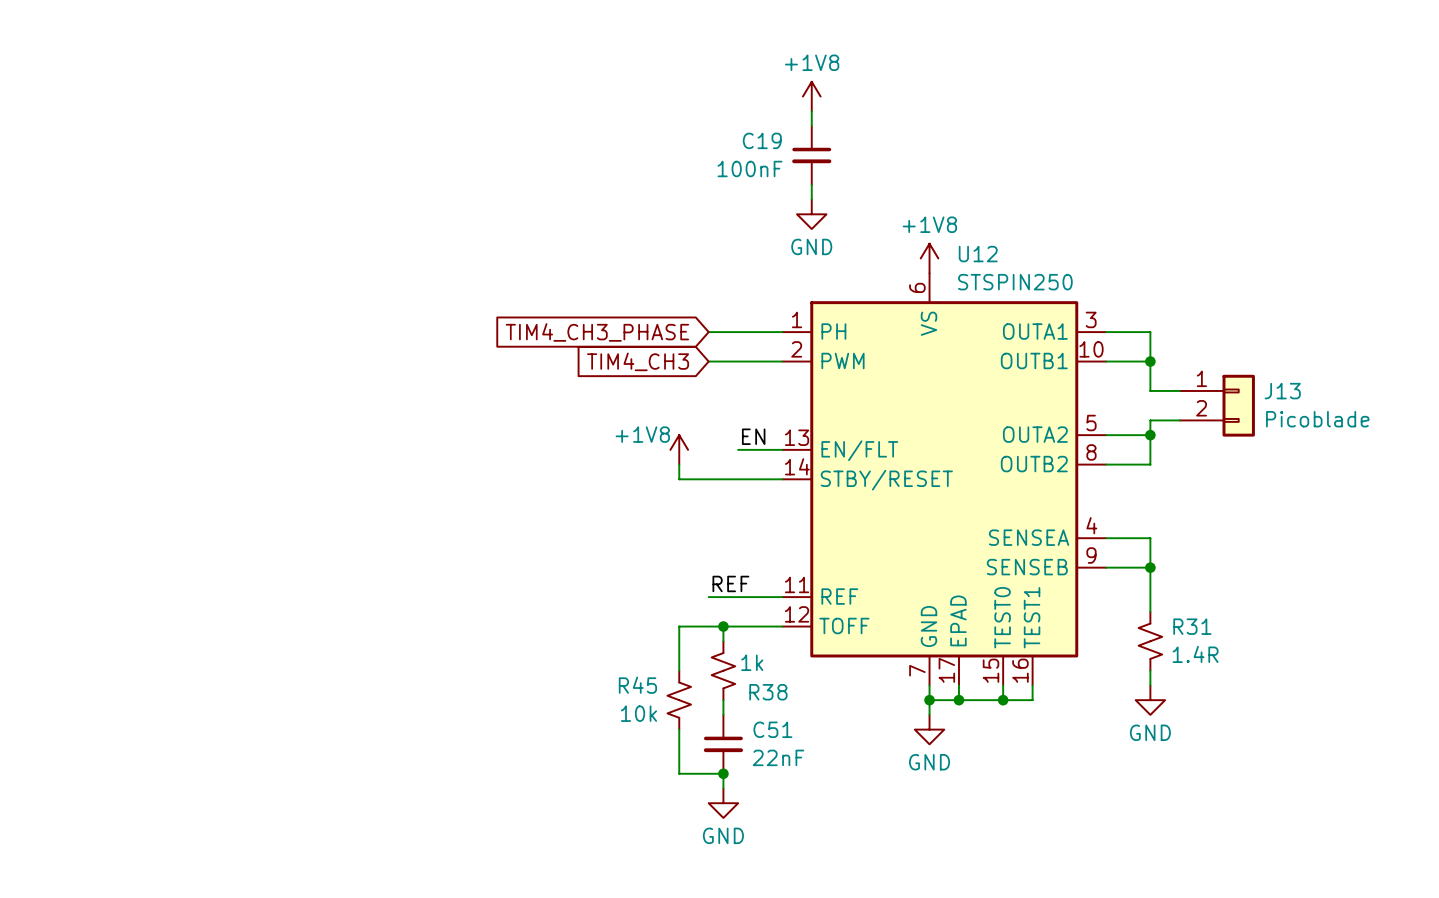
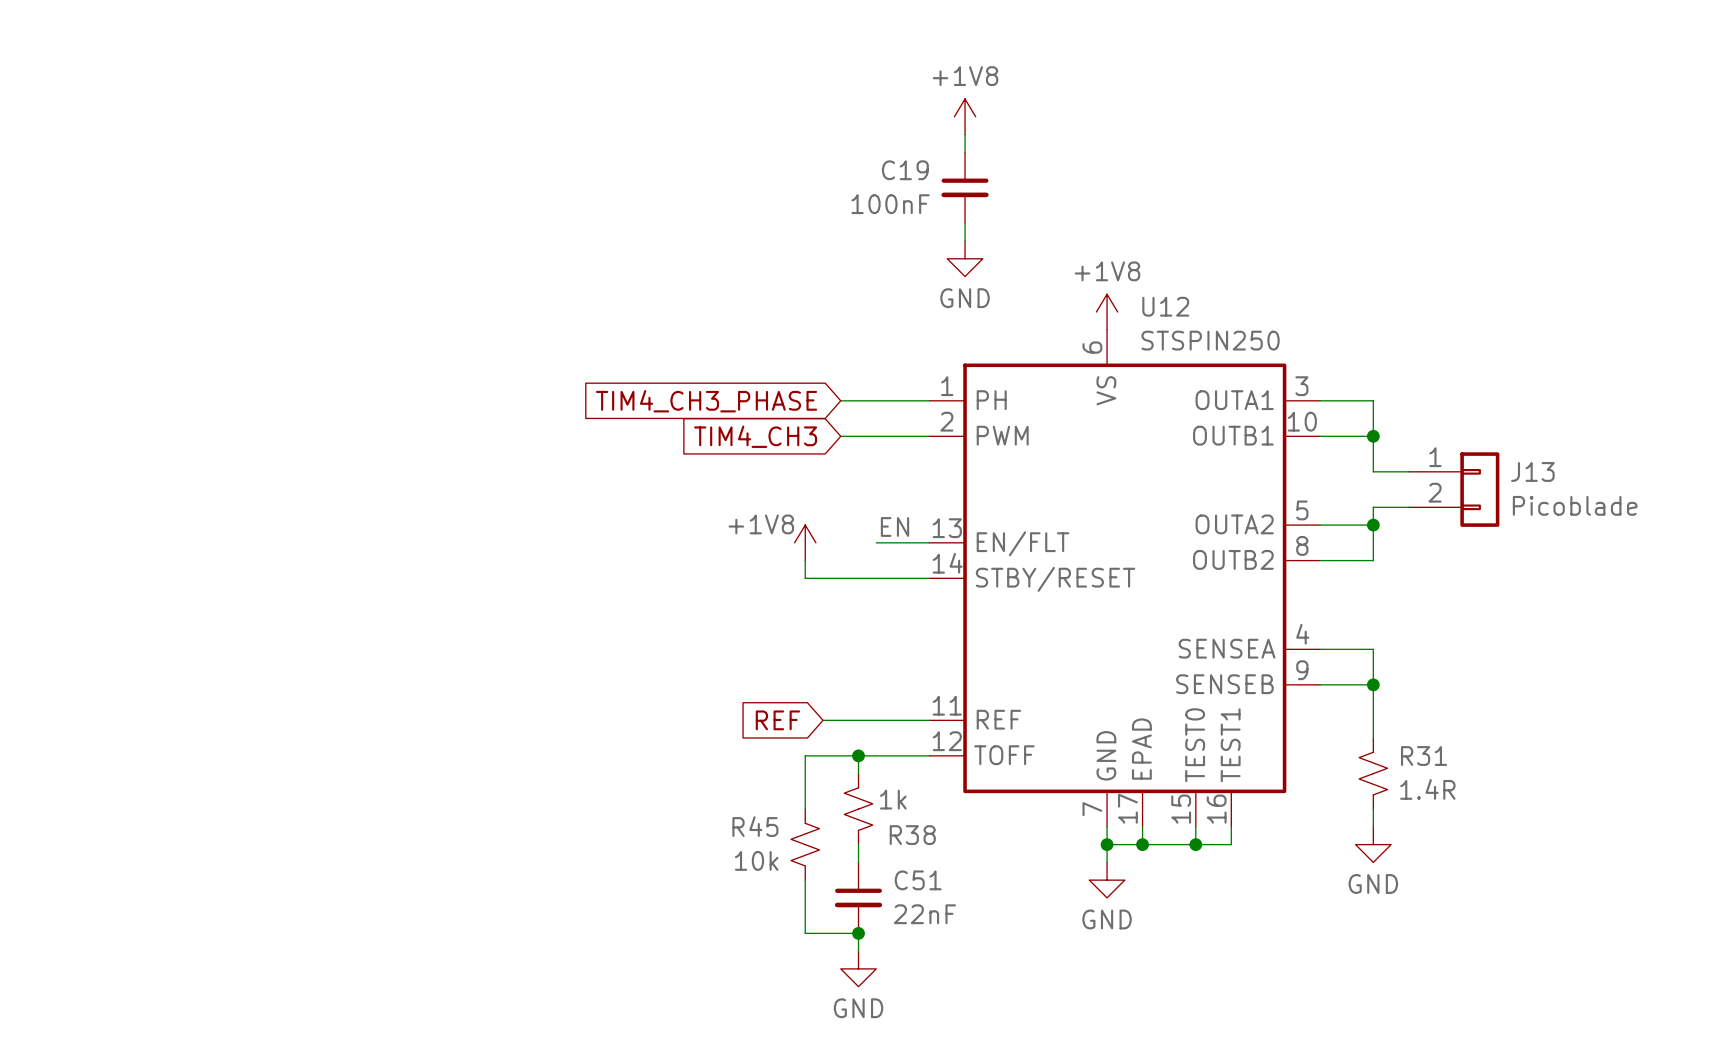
label: REF (730, 583) -> none
global label: none -> REF (777, 720)
wire: none -> (823, 720) (840, 720)

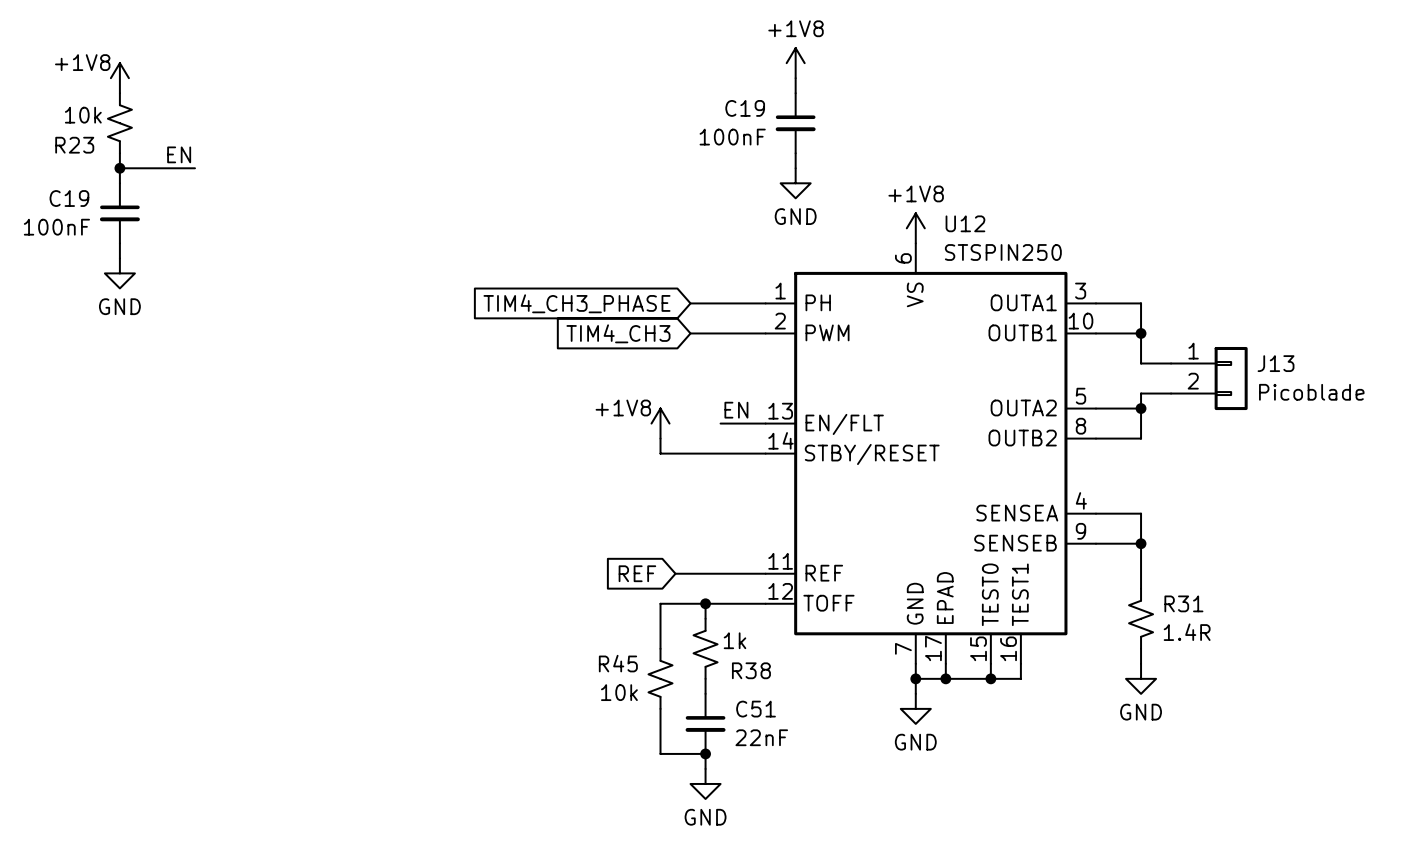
power symbol: none -> +1V8 (119, 78)
R23: none -> 10k (119, 123)
wire: none -> (119, 153) (119, 183)
label: none -> EN (179, 154)
wire: none -> (119, 168) (194, 168)
junction: none -> (119, 168)
C19: none -> 100nF (119, 213)
wire: none -> (119, 243) (119, 258)
power symbol: none -> GND (119, 273)

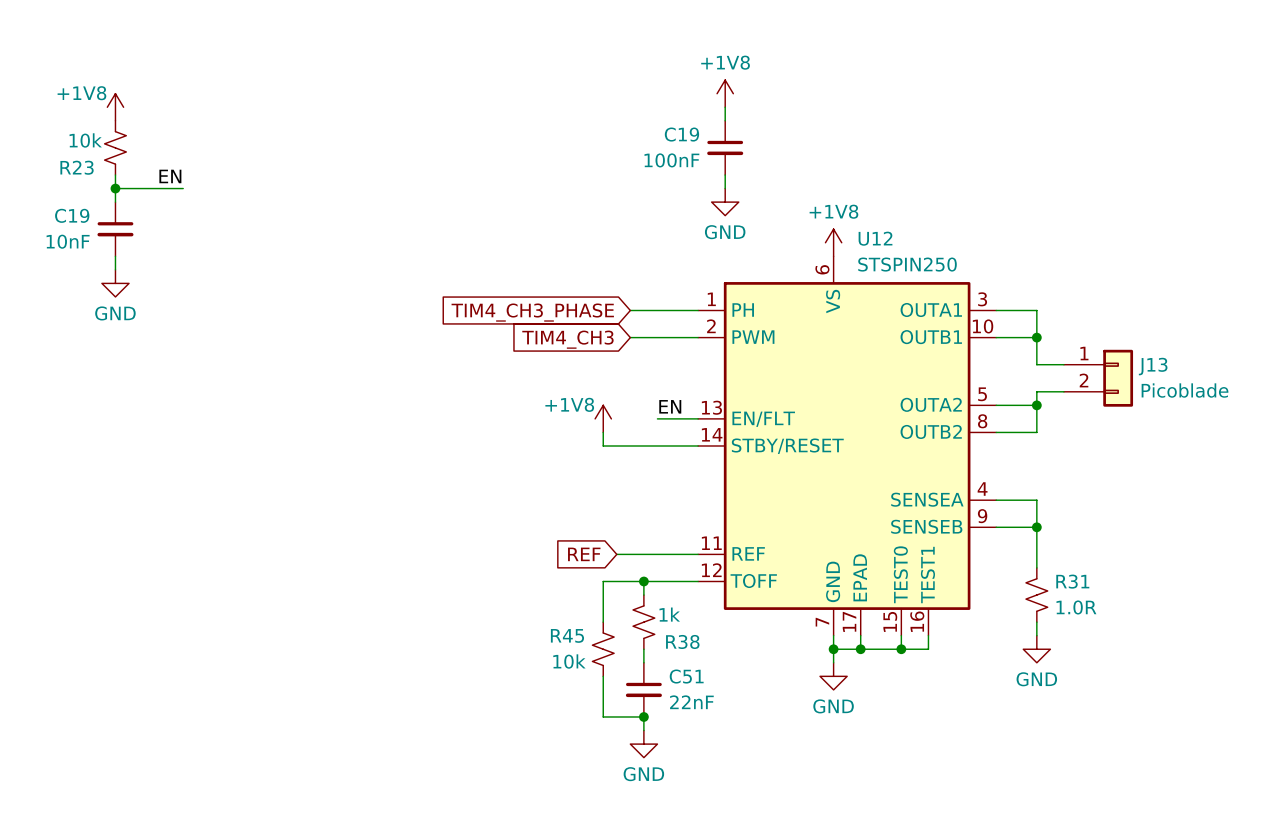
C19 value: 100nF (56, 227) -> 10nF (68, 241)
R31 value: 1.4R (1187, 632) -> 1.0R (1076, 607)

